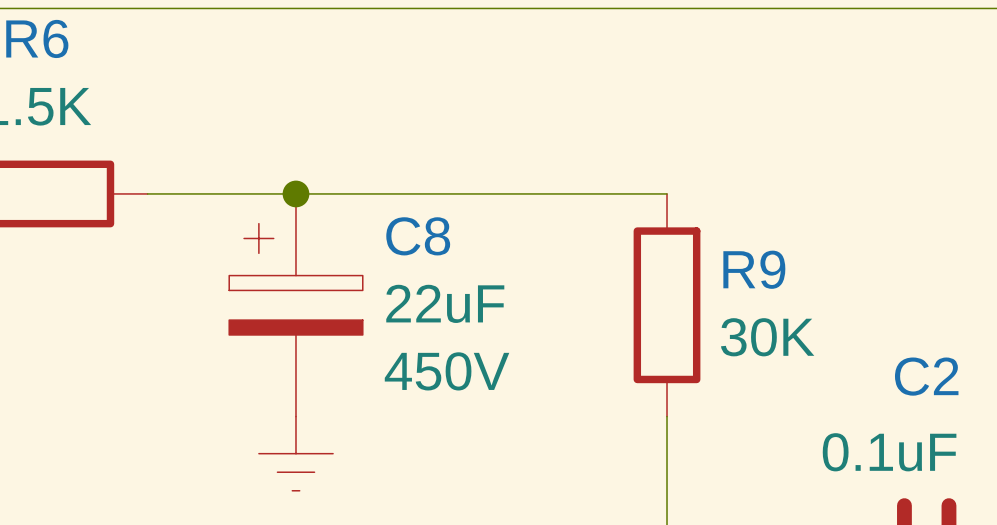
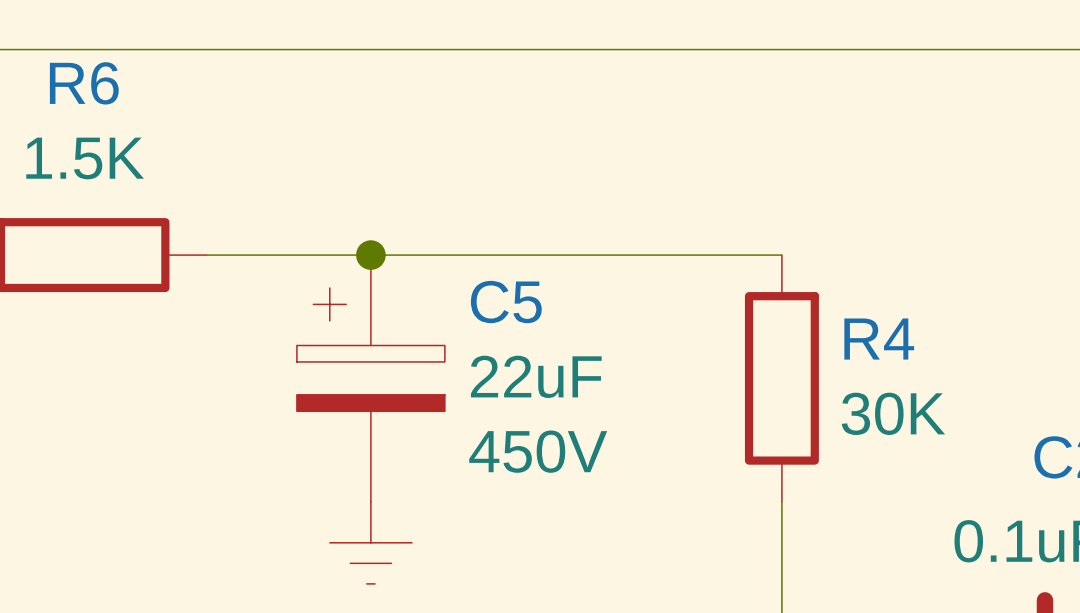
C8 name: C8 (418, 236) -> C5 (506, 302)
R9 name: R9 (754, 269) -> R4 (879, 339)

